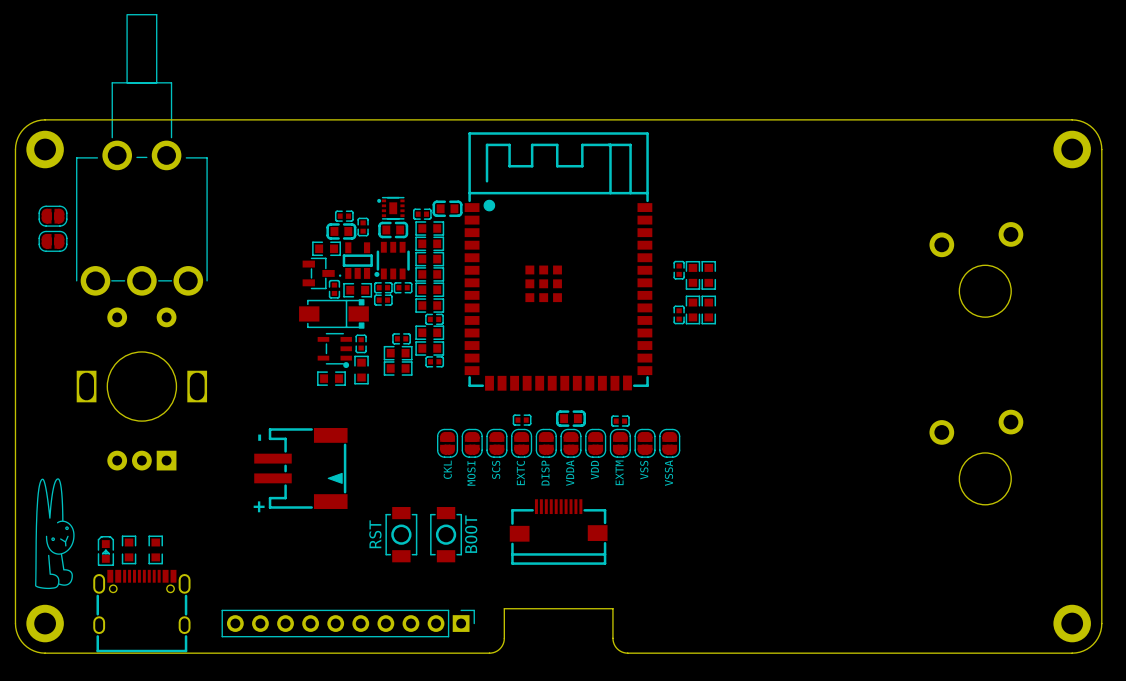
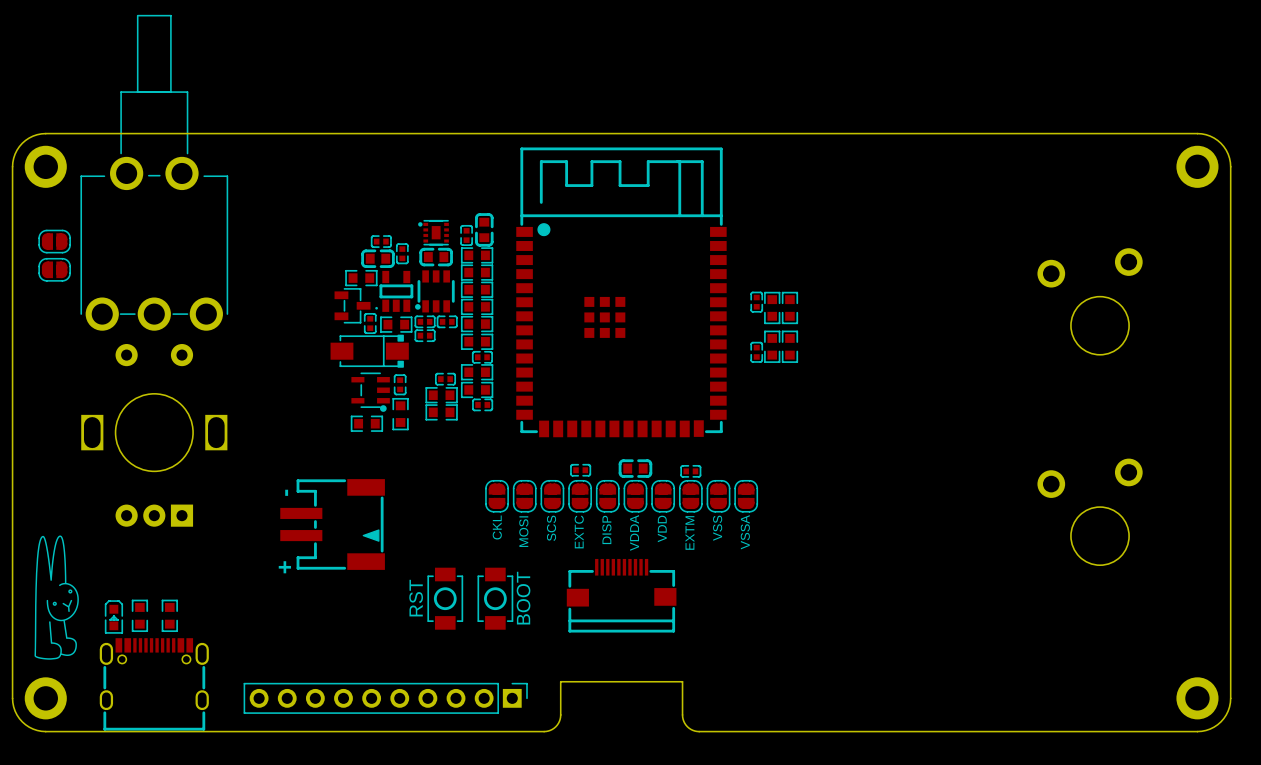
part rotation: 0° (447, 208) -> 90° counterclockwise (484, 229)
part rotation: 0° (422, 214) -> 90° clockwise (466, 235)

